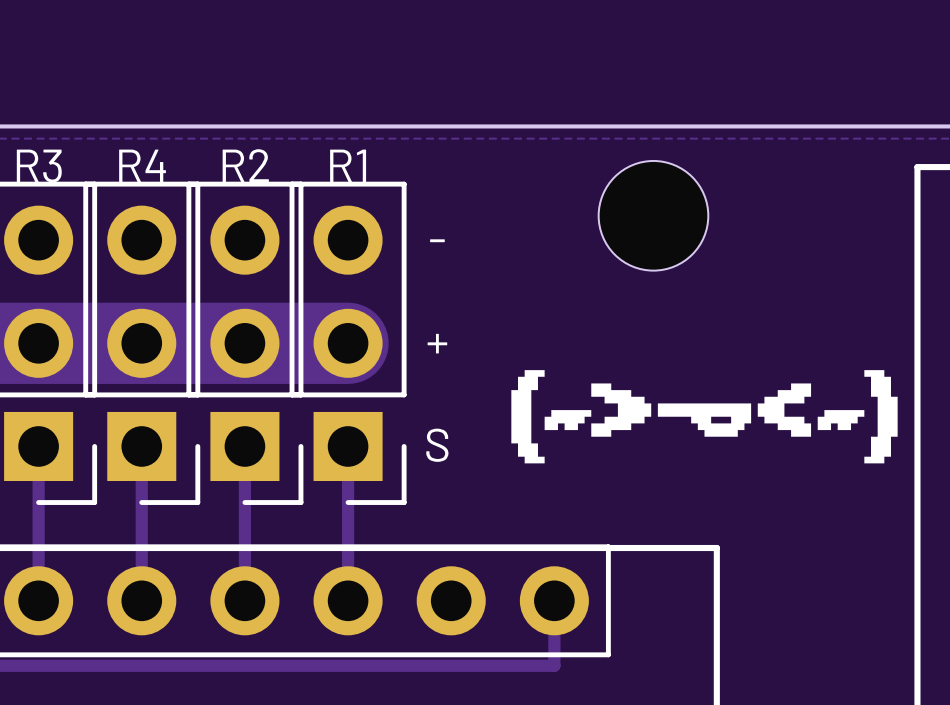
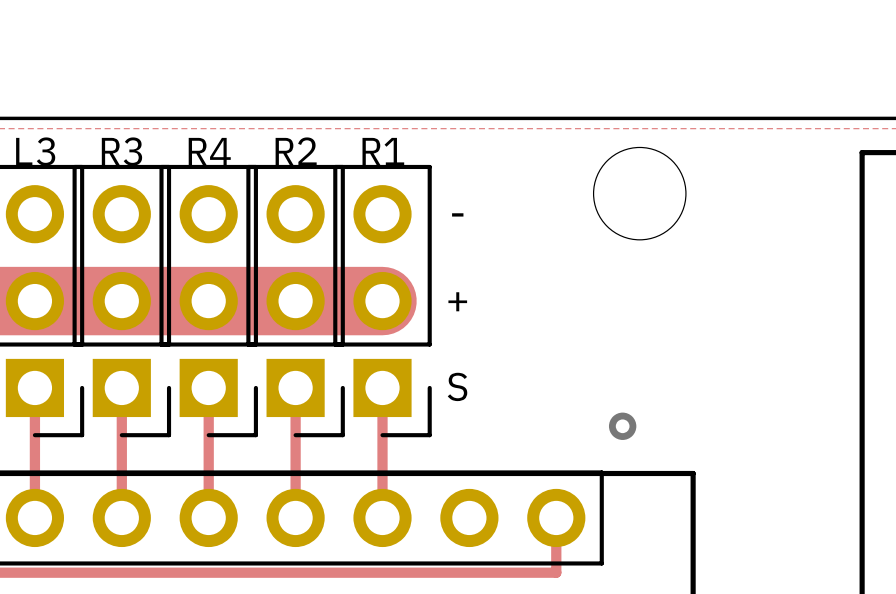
drawing: [511, 370, 898, 464] -> none
via: none -> (622, 426)

